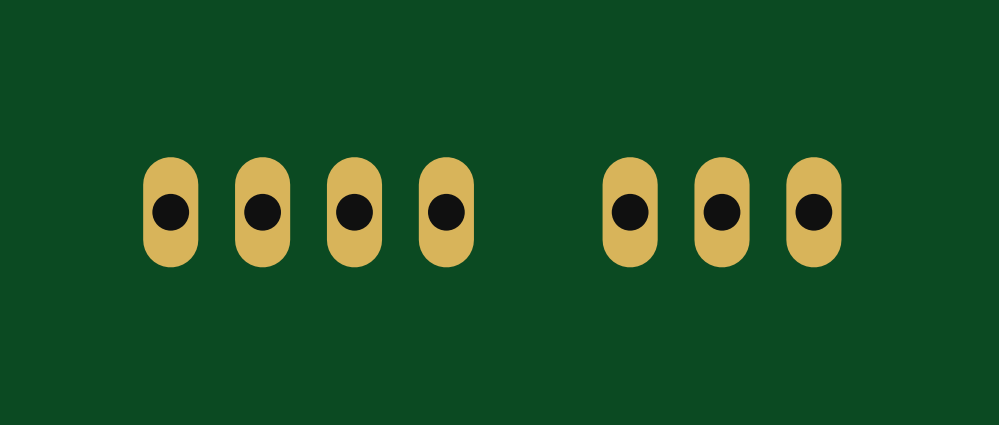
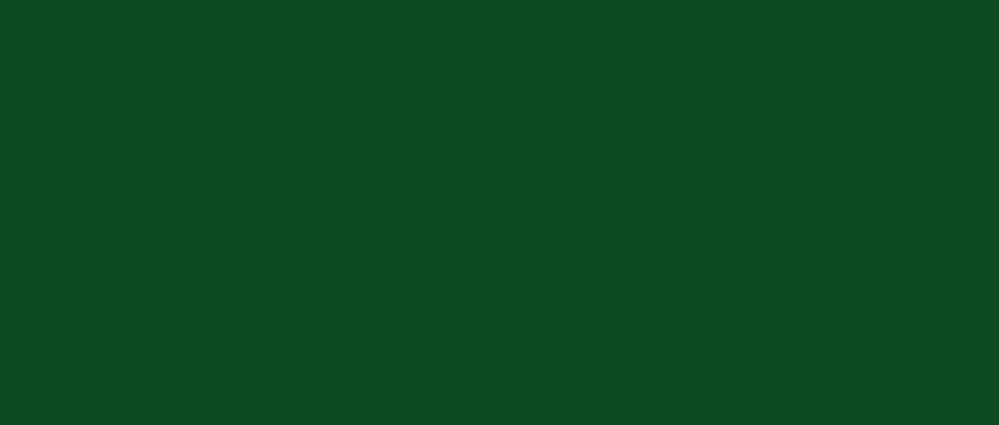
part: (308, 212) -> none
part: (722, 212) -> none

